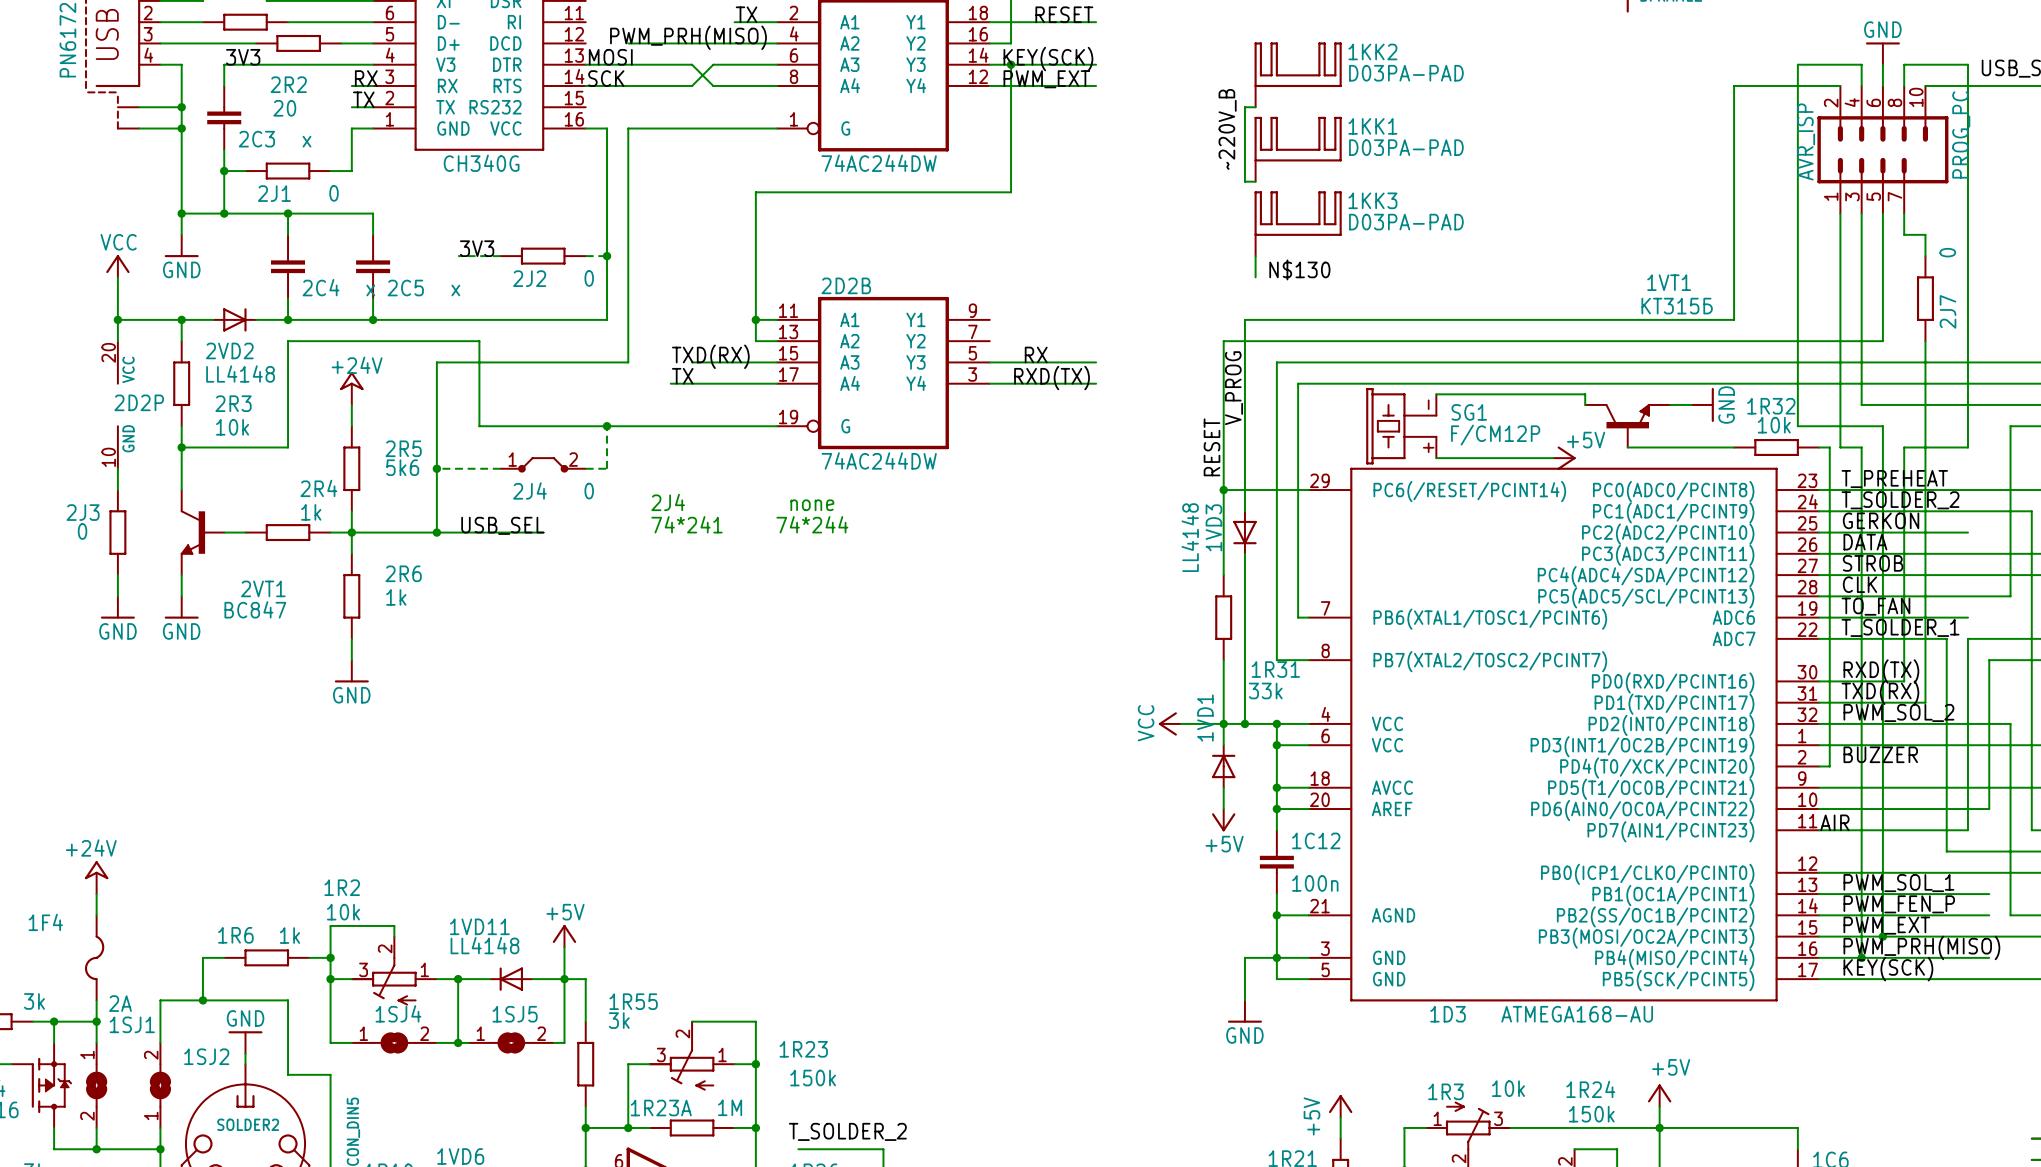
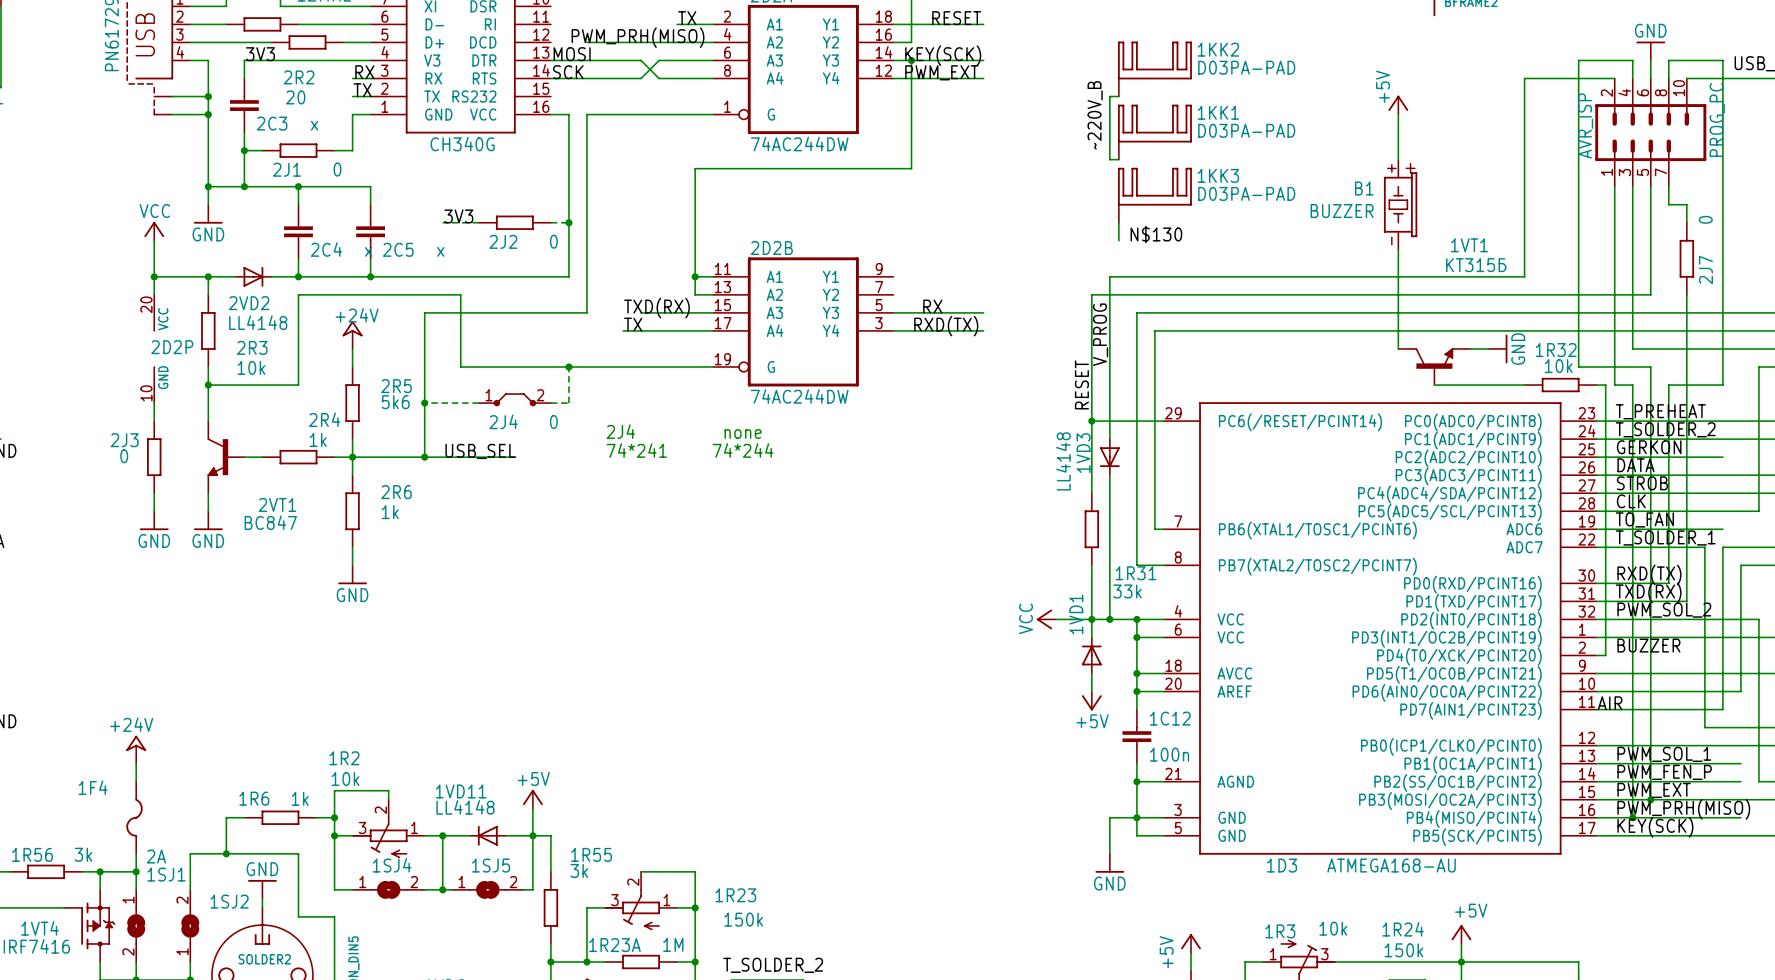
power symbol: none -> +5V (1398, 105)
wire: none -> (1398, 114) (1398, 159)
B1: none -> BUZZER (1400, 204)
wire: (1436, 394) (1585, 394) -> (1398, 249) (1398, 339)
SG1: F/CM12P (1401, 426) -> none
wire: (1436, 458) (1553, 458) -> none
power symbol: +5V (1564, 458) -> none

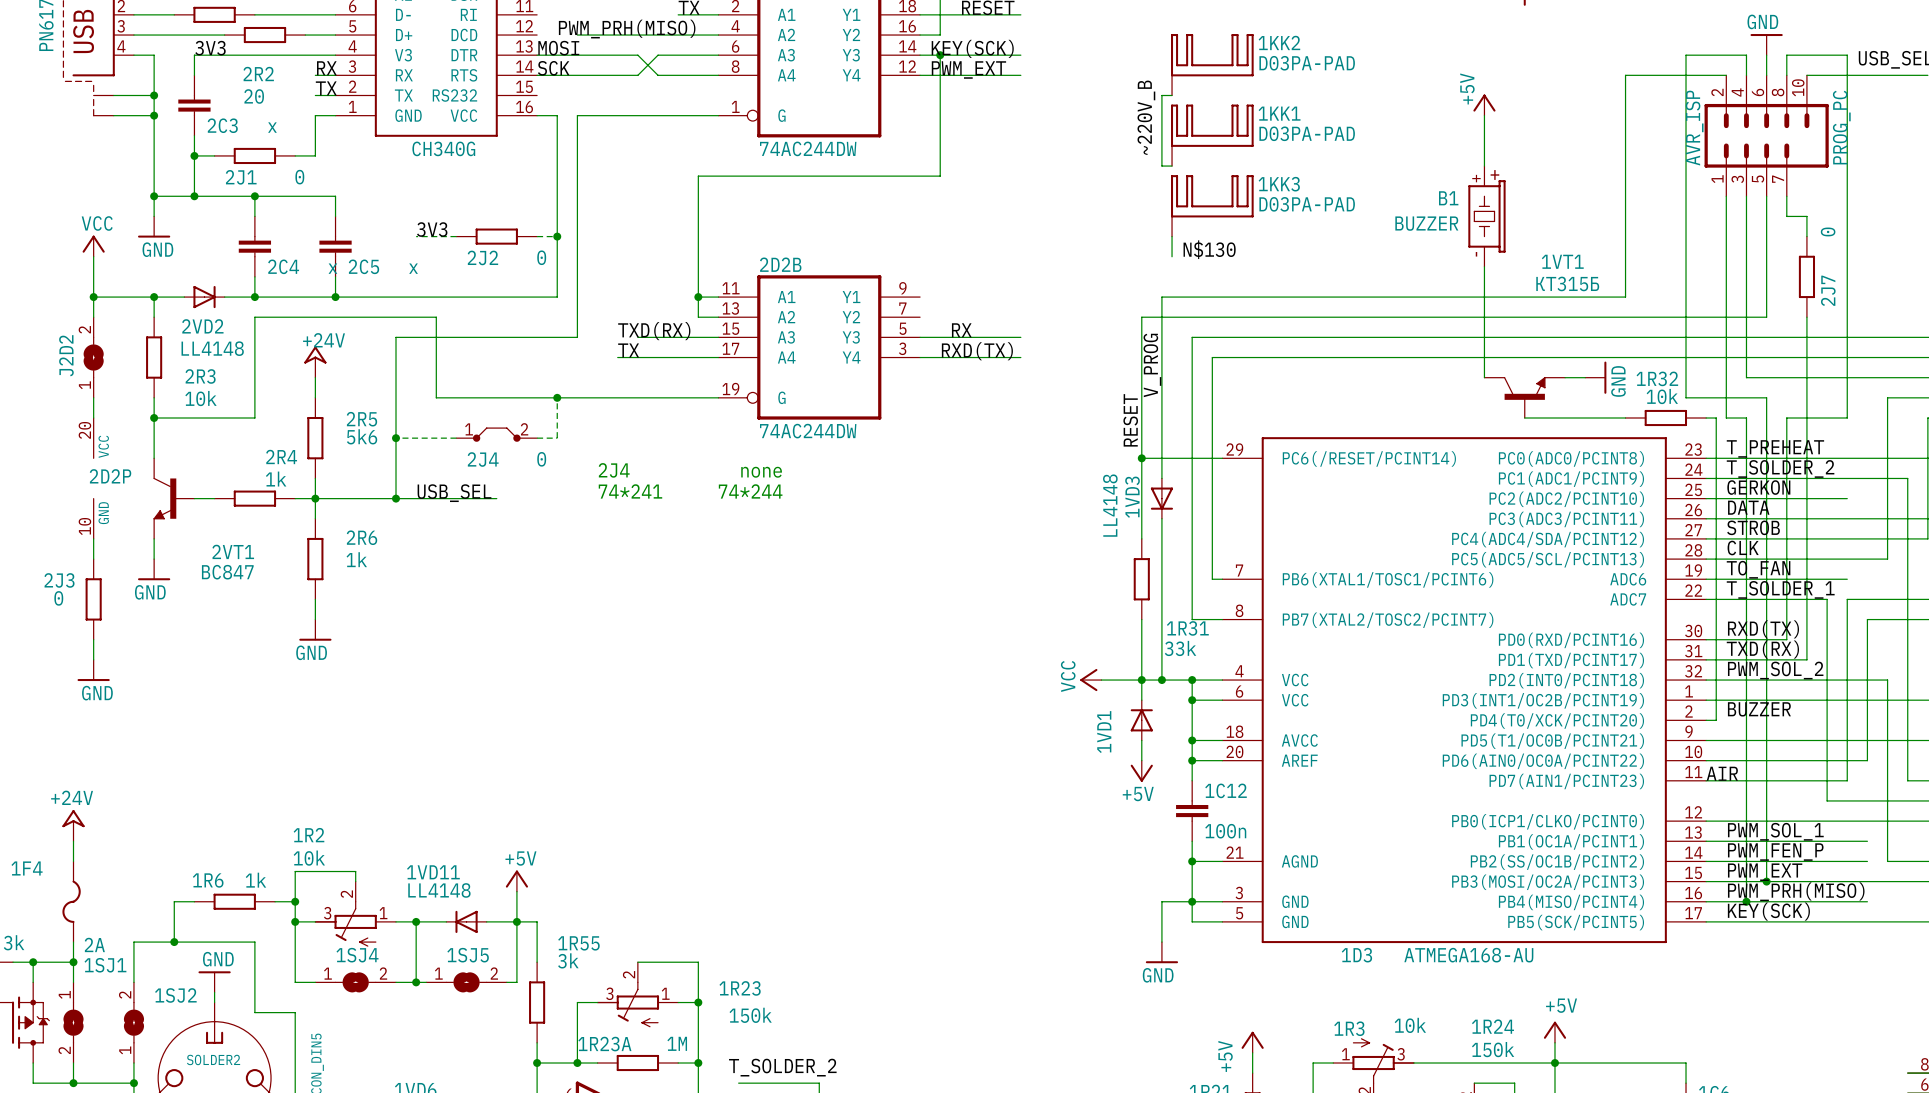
J2D2: none -> (93, 357)
2D2P position: (154, 348) -> (93, 478)
2J3 position: (154, 457) -> (93, 599)
power symbol position: GND (154, 520) -> GND (93, 670)
wire: none -> (93, 639) (93, 659)
1VD1 name position: 1VD1 (1076, 614) -> 1VD1 (1104, 732)

